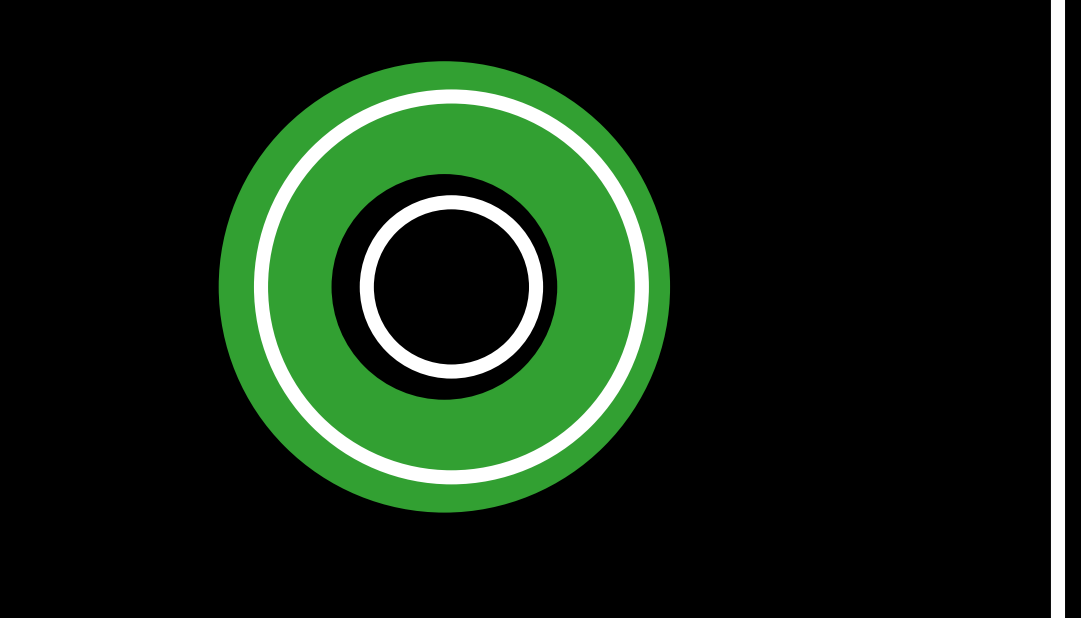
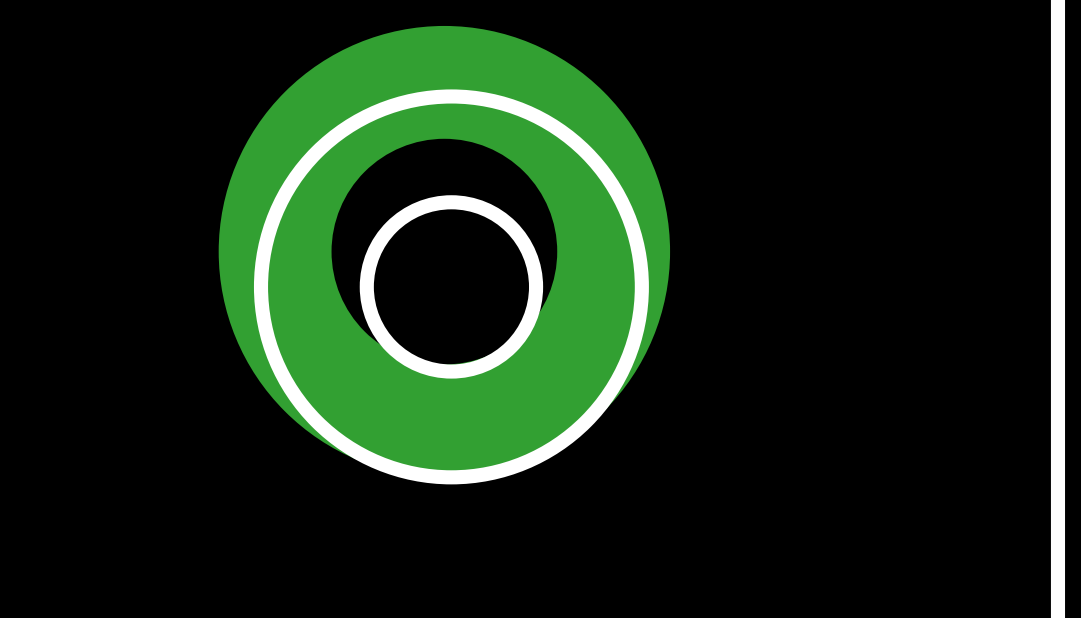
part position: (444, 286) -> (444, 251)

